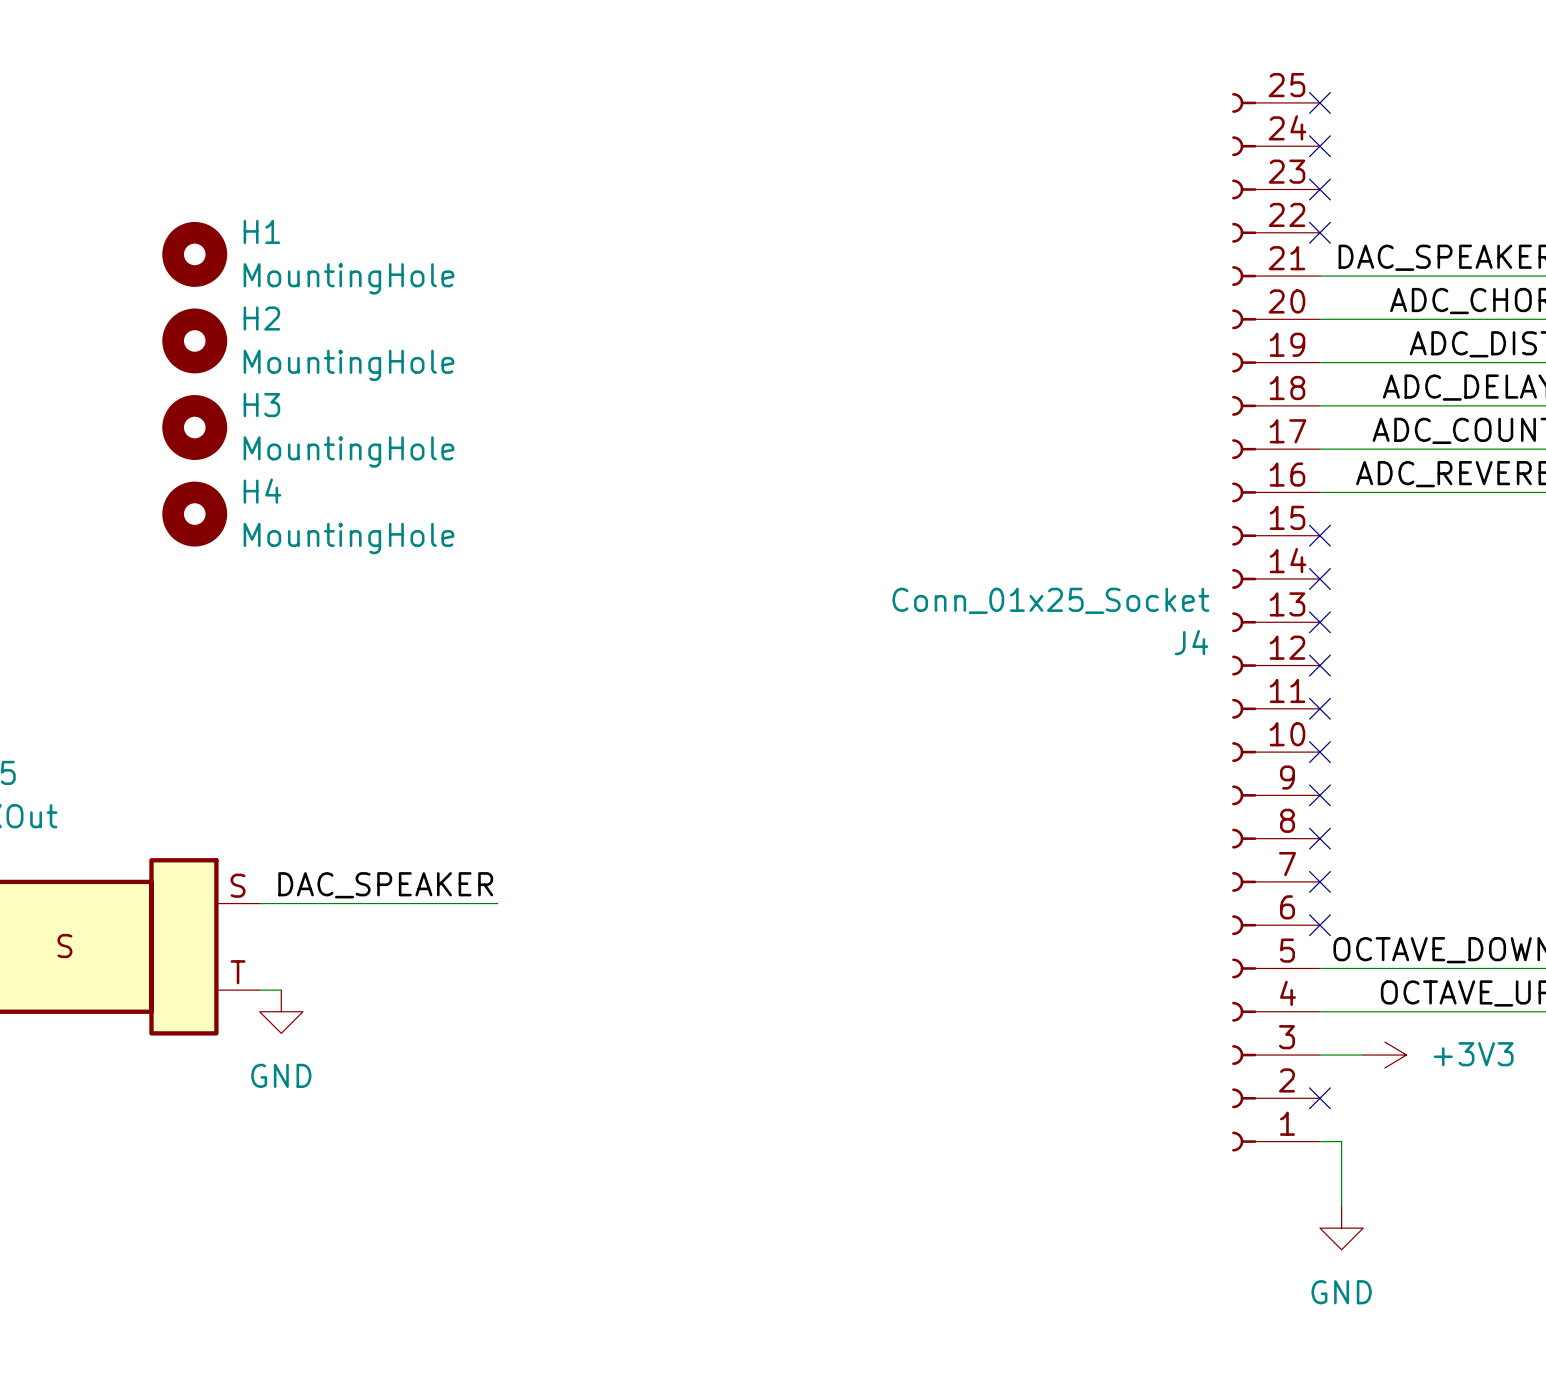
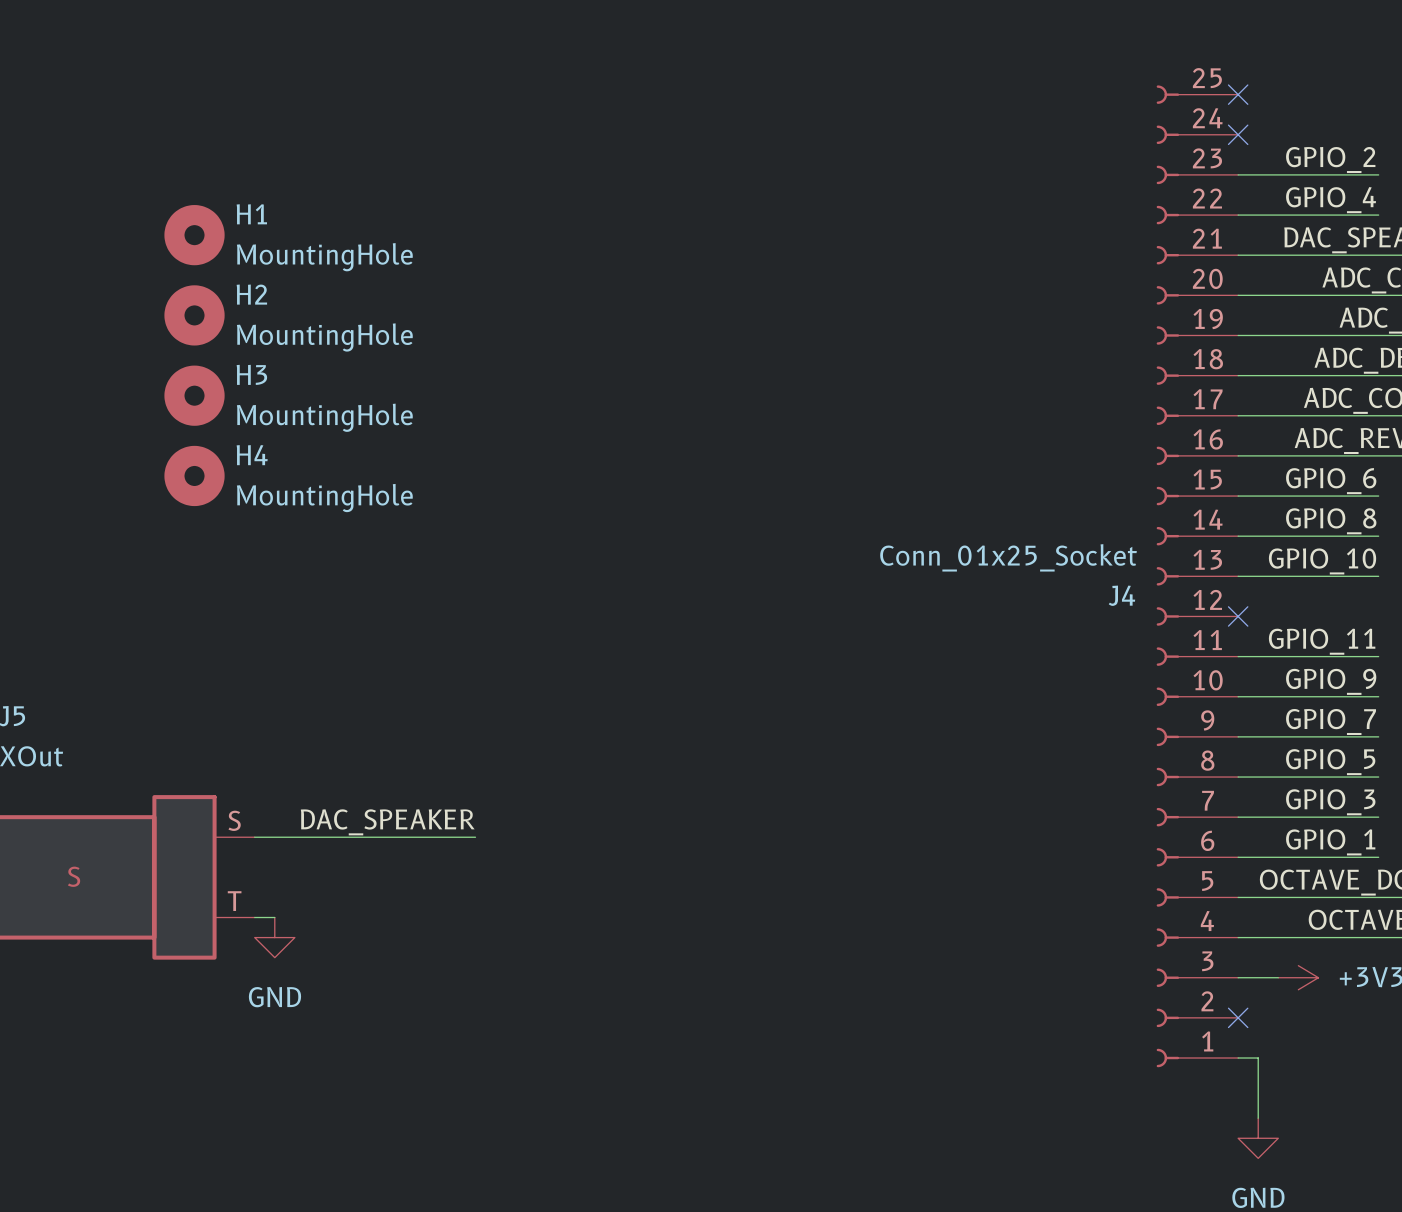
label: none -> GPIO_2 (1330, 160)
wire: none -> (1238, 174) (1378, 174)
no-connect mark: (1319, 189) -> none
label: none -> GPIO_4 (1331, 200)
wire: none -> (1238, 215) (1378, 215)
no-connect mark: (1319, 232) -> none
label: none -> GPIO_6 (1331, 481)
wire: none -> (1238, 496) (1378, 496)
no-connect mark: (1319, 535) -> none
label: none -> GPIO_8 (1331, 521)
wire: none -> (1238, 536) (1378, 536)
no-connect mark: (1319, 578) -> none
label: none -> GPIO_10 (1322, 561)
wire: none -> (1238, 576) (1378, 576)
no-connect mark: (1319, 622) -> none
label: none -> GPIO_11 (1322, 641)
wire: none -> (1238, 656) (1378, 656)
no-connect mark: (1319, 708) -> none
label: none -> GPIO_9 (1331, 681)
wire: none -> (1238, 696) (1378, 696)
no-connect mark: (1319, 752) -> none
label: none -> GPIO_7 (1331, 721)
wire: none -> (1238, 736) (1378, 736)
no-connect mark: (1319, 795) -> none
label: none -> GPIO_5 (1330, 762)
wire: none -> (1238, 777) (1378, 777)
no-connect mark: (1319, 838) -> none
label: none -> GPIO_3 (1330, 802)
wire: none -> (1238, 817) (1378, 817)
no-connect mark: (1319, 881) -> none
label: none -> GPIO_1 (1330, 842)
wire: none -> (1238, 857) (1378, 857)
no-connect mark: (1319, 925) -> none

